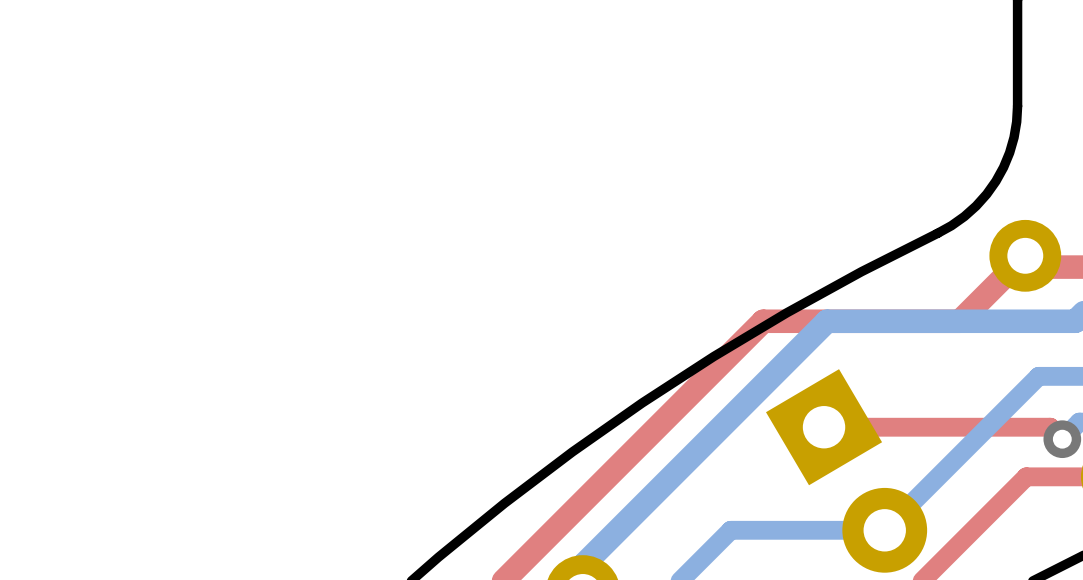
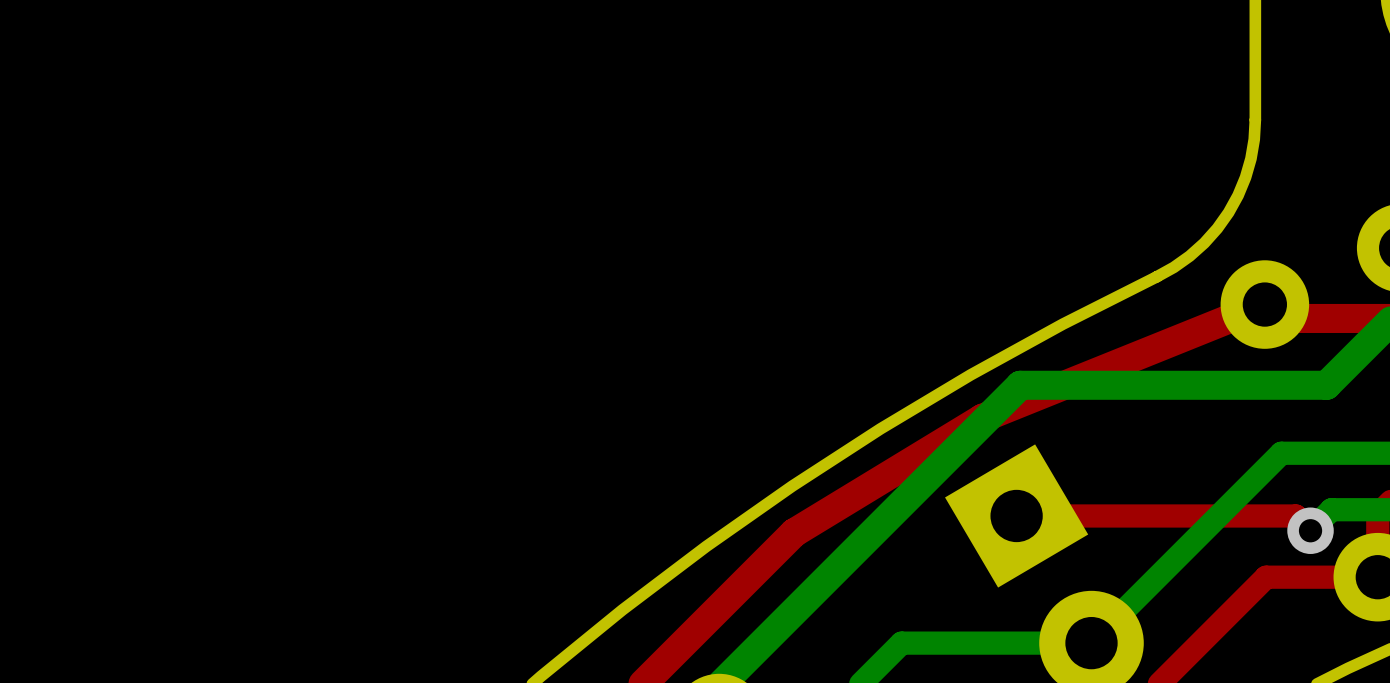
top track: (1025, 255) (959, 321) (763, 321) (643, 440) -> (1264, 304) (982, 418) (794, 532)

